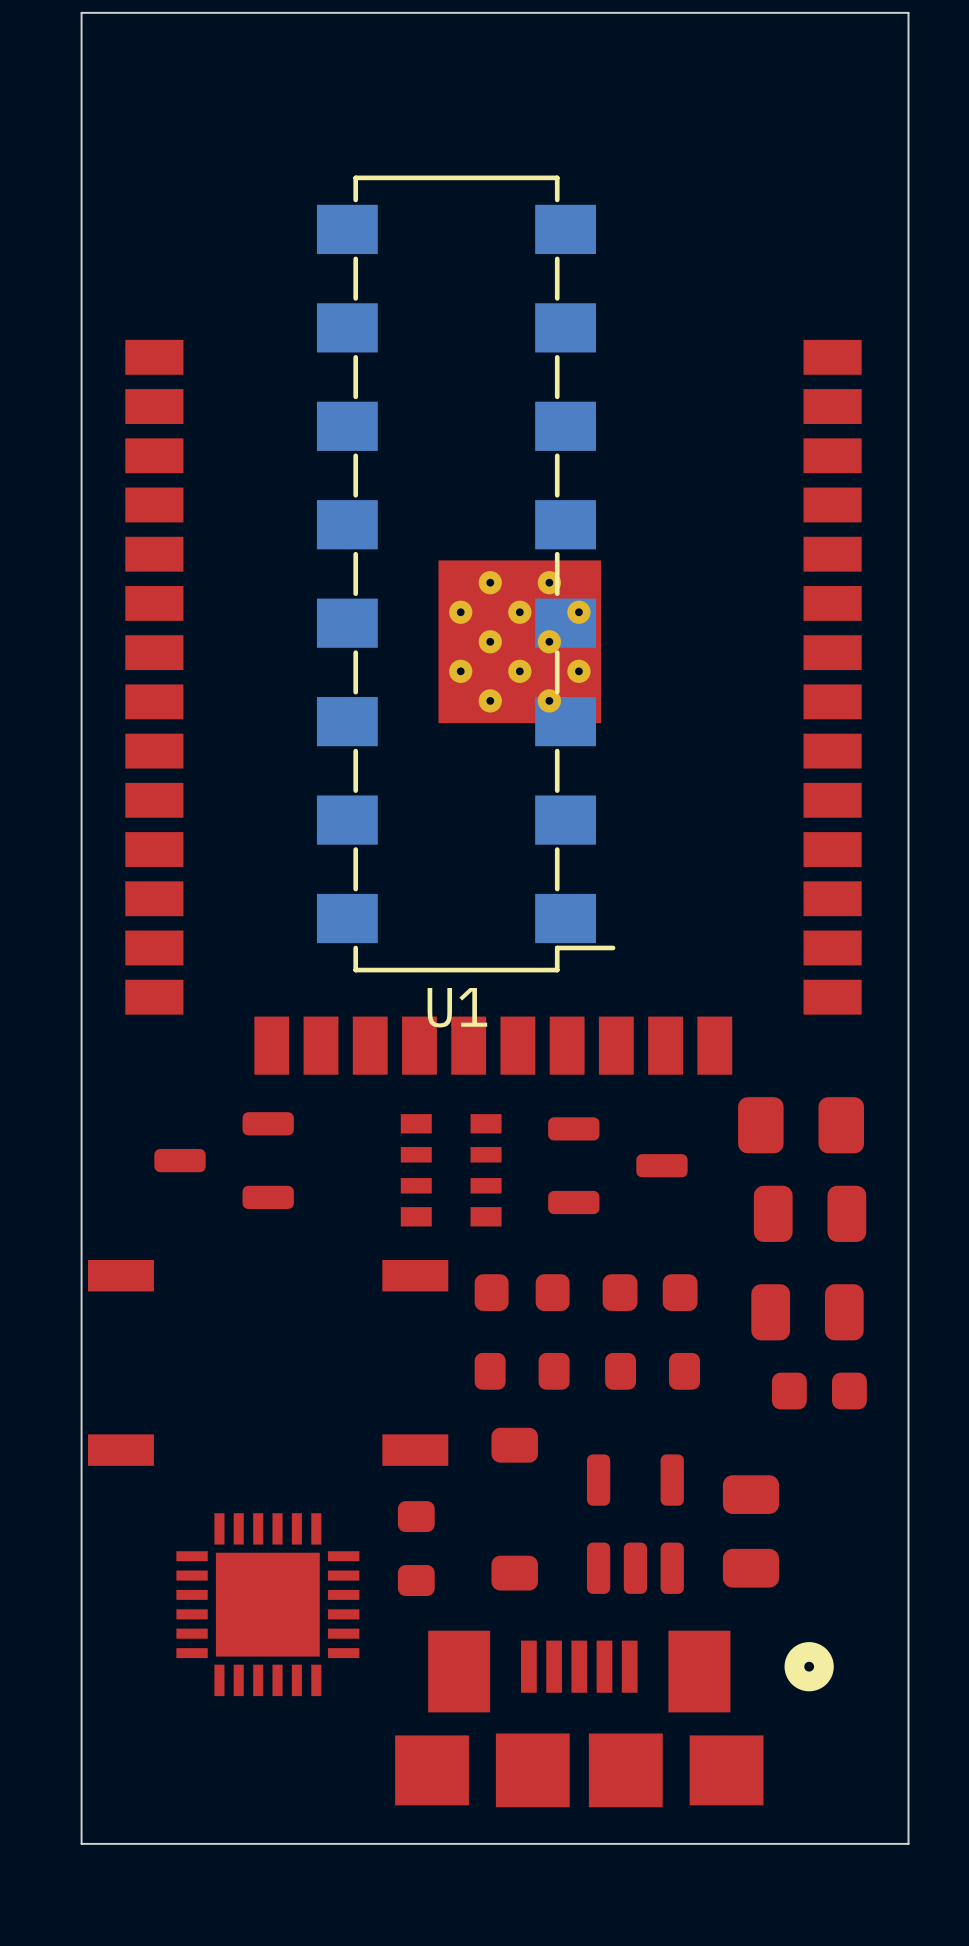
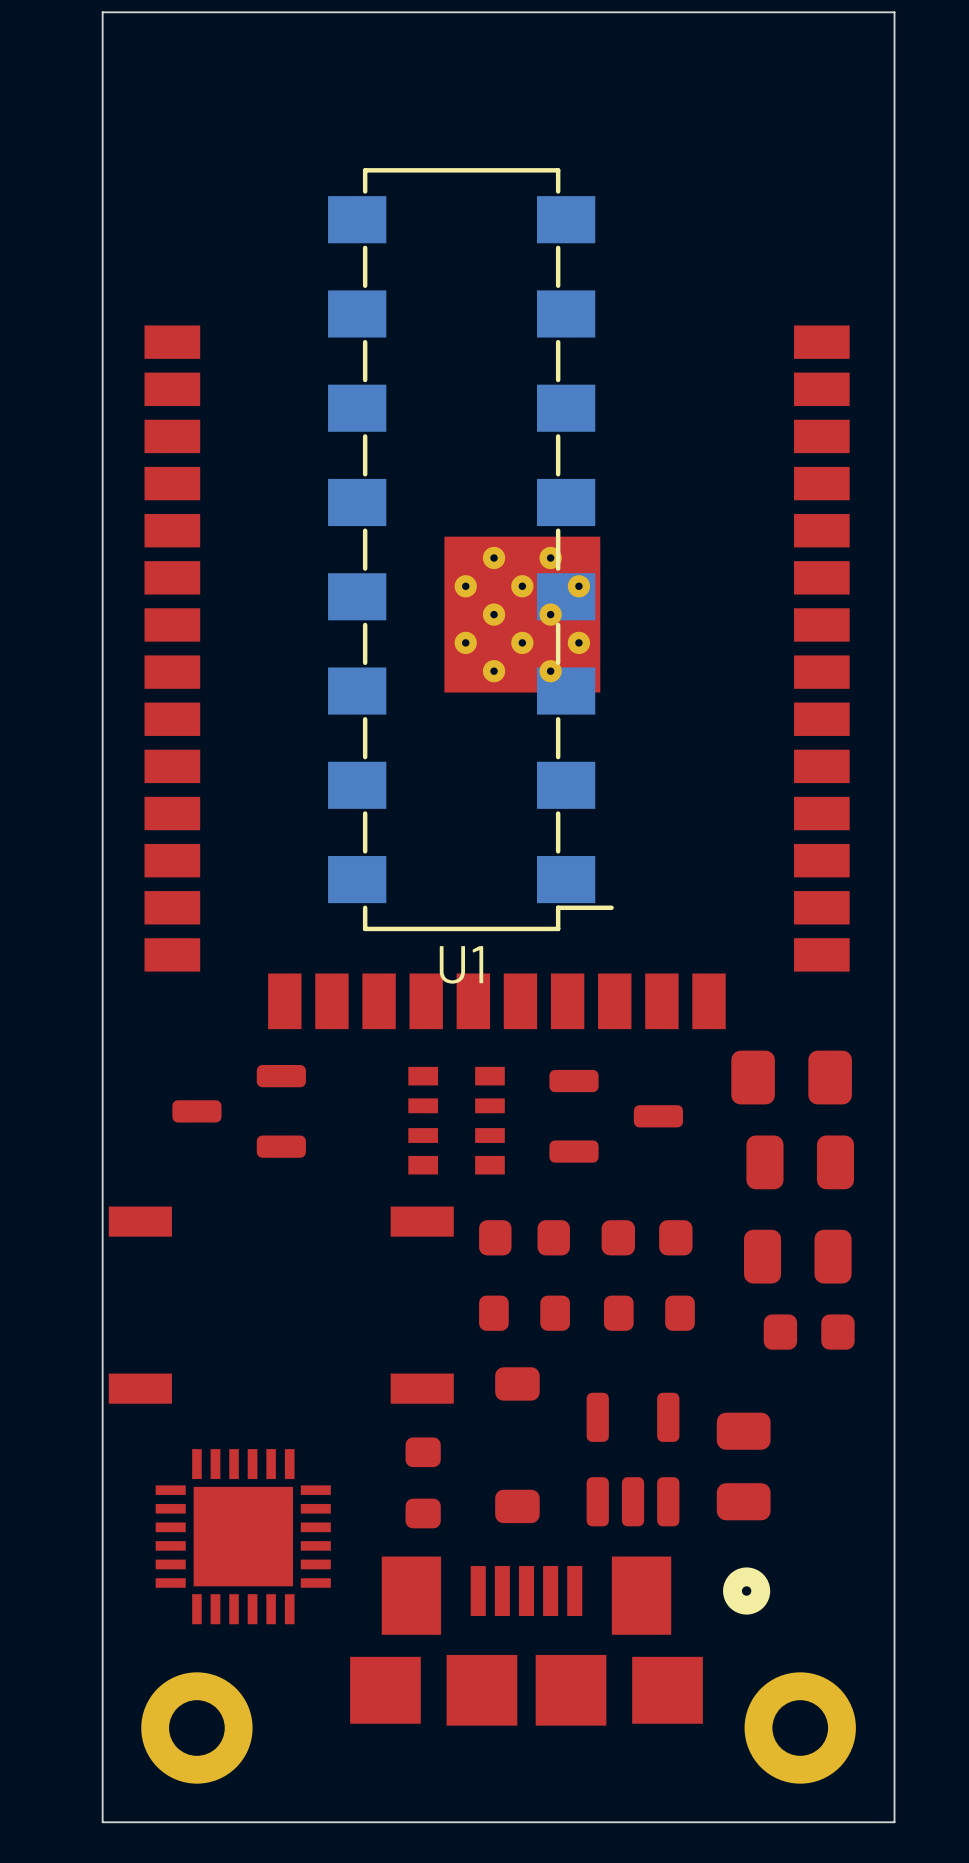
part position: (267, 1604) -> (243, 1536)
part position: (614, 1718) -> (560, 1641)
part: none -> (196, 1728)
part: none -> (800, 1728)
board edge: (908, 1843) (81, 1843) -> (894, 1765) (894, 1822) (102, 1822) (102, 1765)

